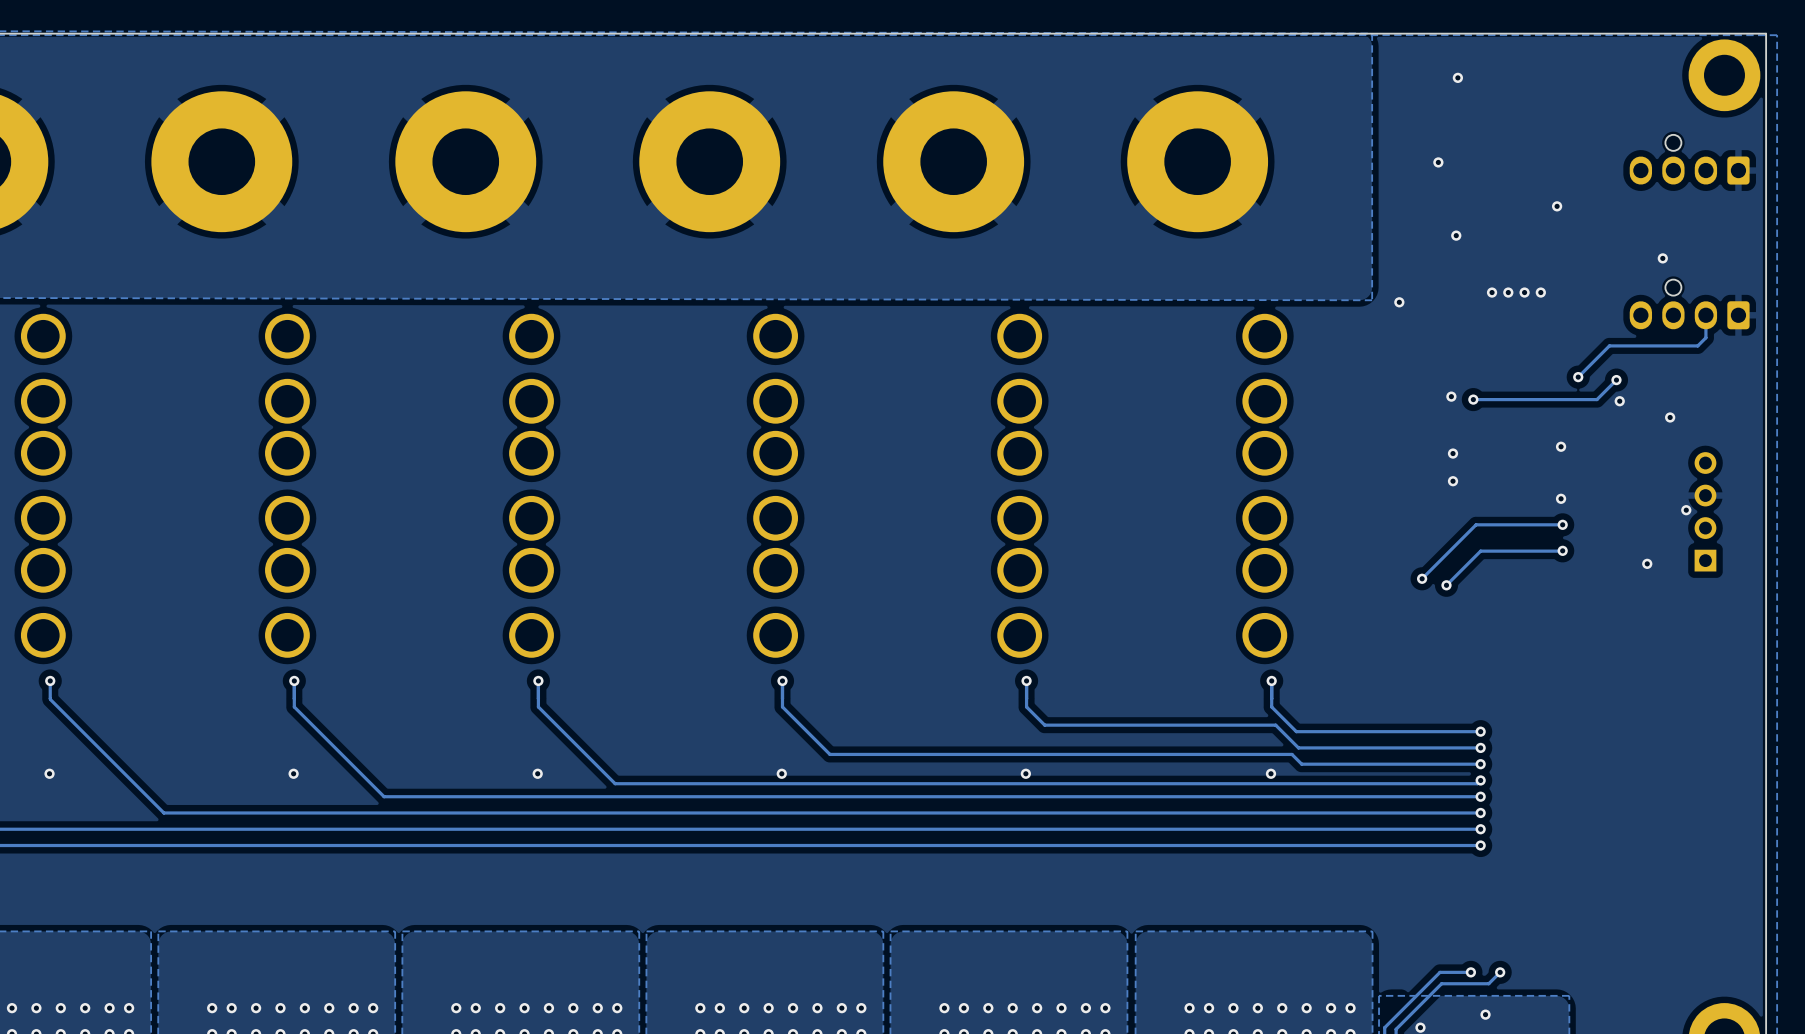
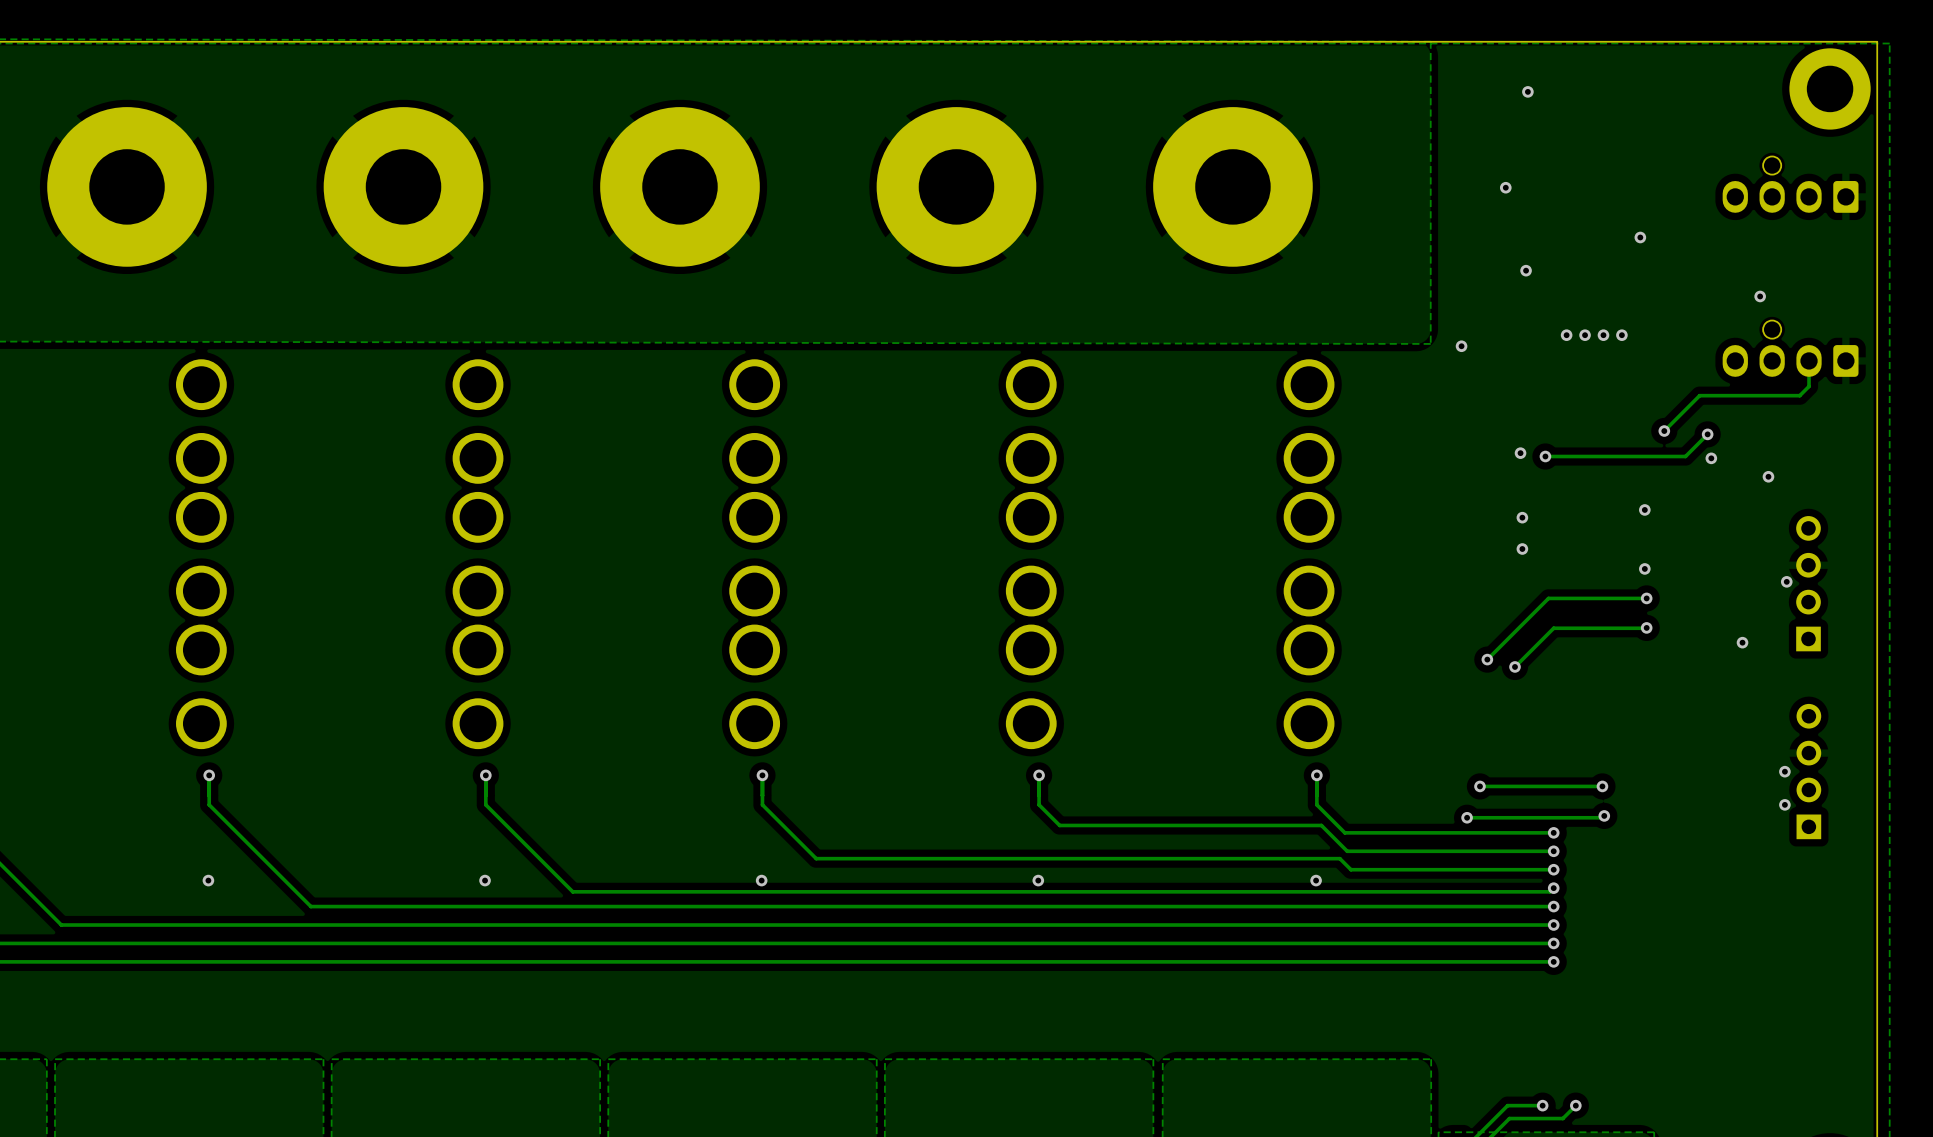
via: none -> (1784, 771)
part: none -> (1808, 771)
via: none -> (1479, 786)
track: none -> (1602, 786) (1479, 786)
via: none -> (1602, 786)
via: none -> (1784, 804)
track: none -> (1604, 815) (1602, 817) (1467, 817)
via: none -> (1604, 815)
via: none -> (1467, 817)

